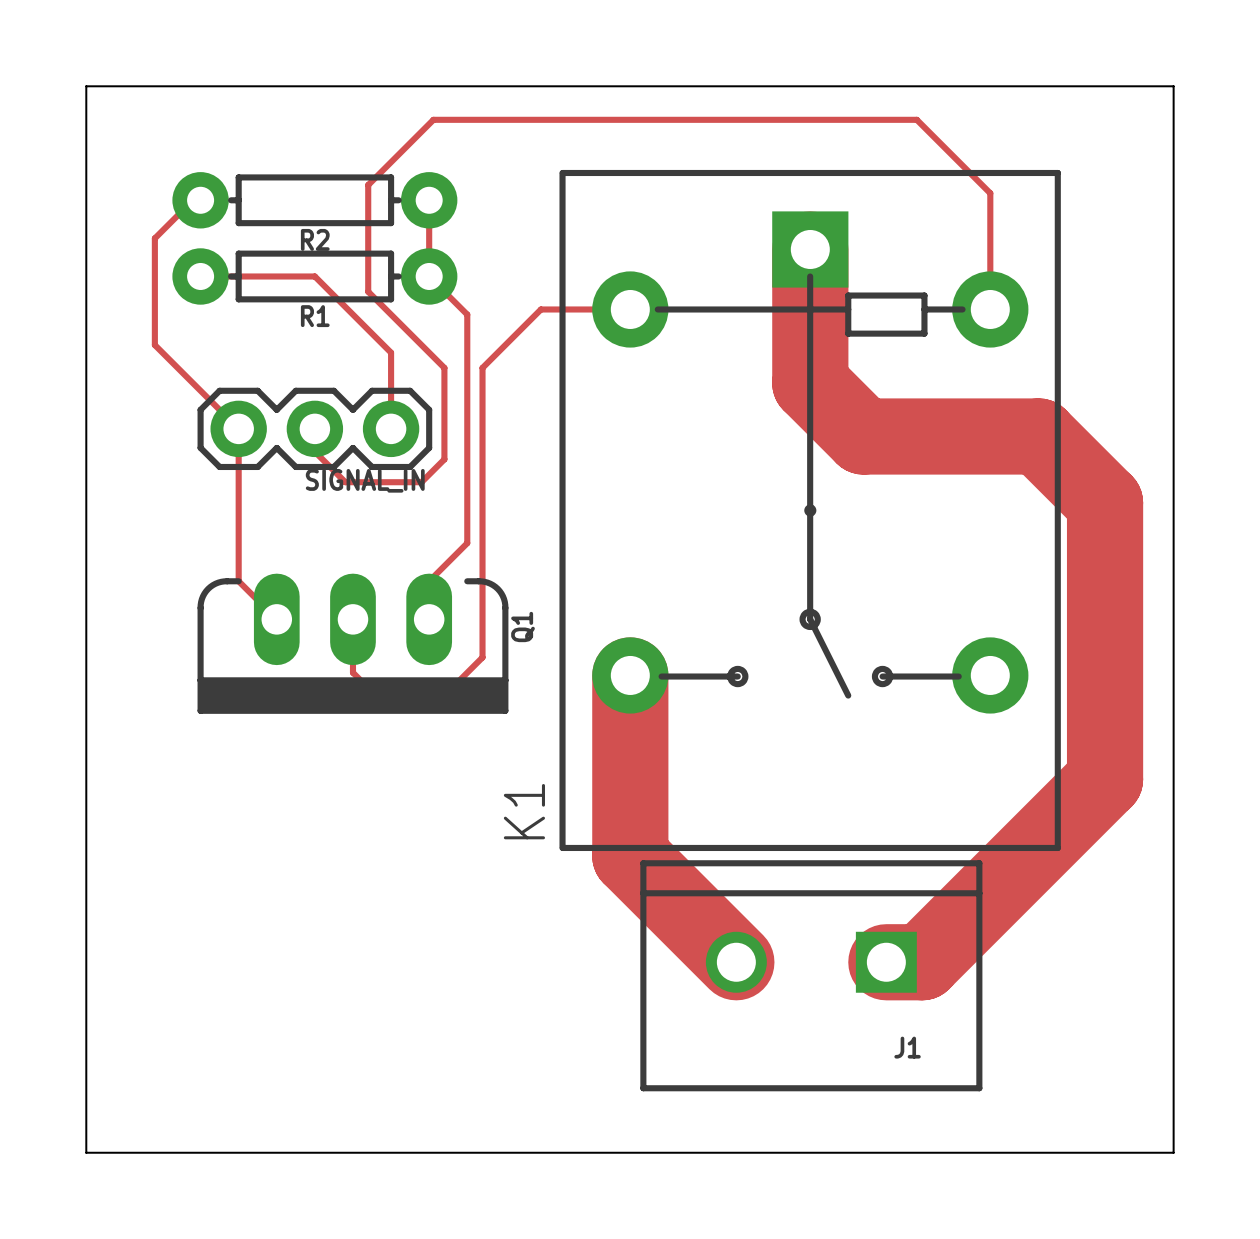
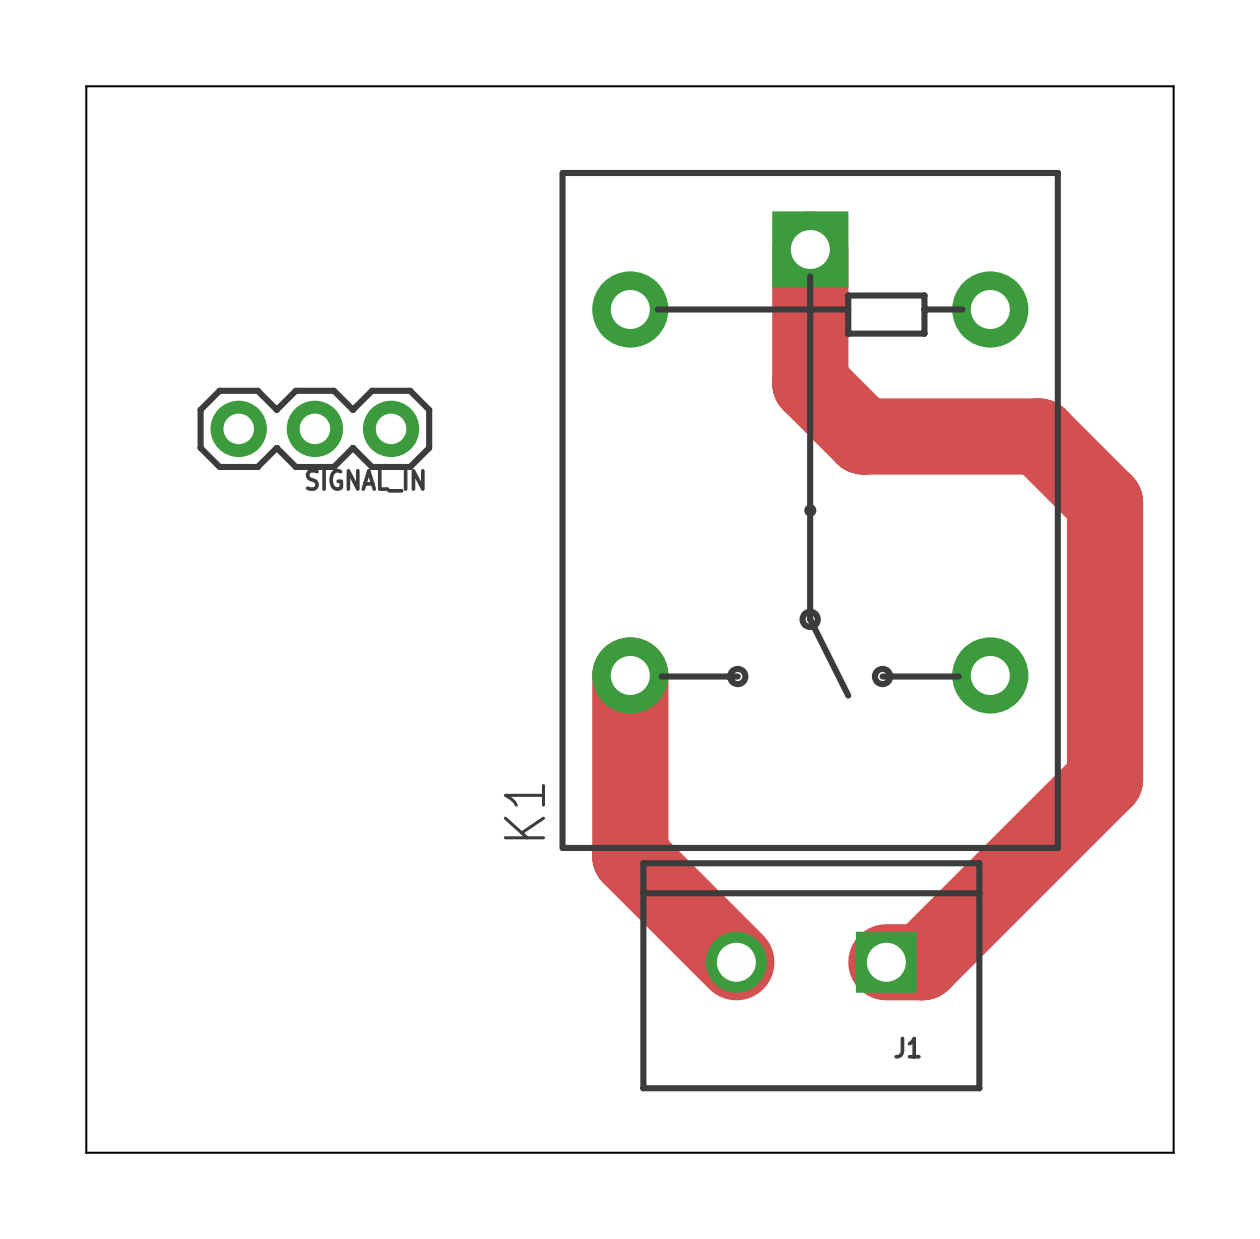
top track: (200, 200) (192, 200) (154, 238) (154, 345) (238, 428) (238, 581) (276, 619) -> none
R2: (314, 200) -> none
top track: (429, 200) (429, 276) (467, 314) (467, 543) (429, 581) (429, 619) -> none
top track: (200, 276) (314, 276) (391, 352) (391, 428) -> none
R1: (314, 276) -> none
top track: (630, 309) (540, 309) (482, 367) (482, 657) (444, 695) (375, 695) (352, 672) (352, 619) -> none
top track: (990, 309) (990, 193) (916, 119) (433, 119) (368, 185) (368, 291) (444, 367) (444, 459) (421, 482) (345, 482) (314, 451) (314, 428) -> none
Q1: (352, 643) -> none

